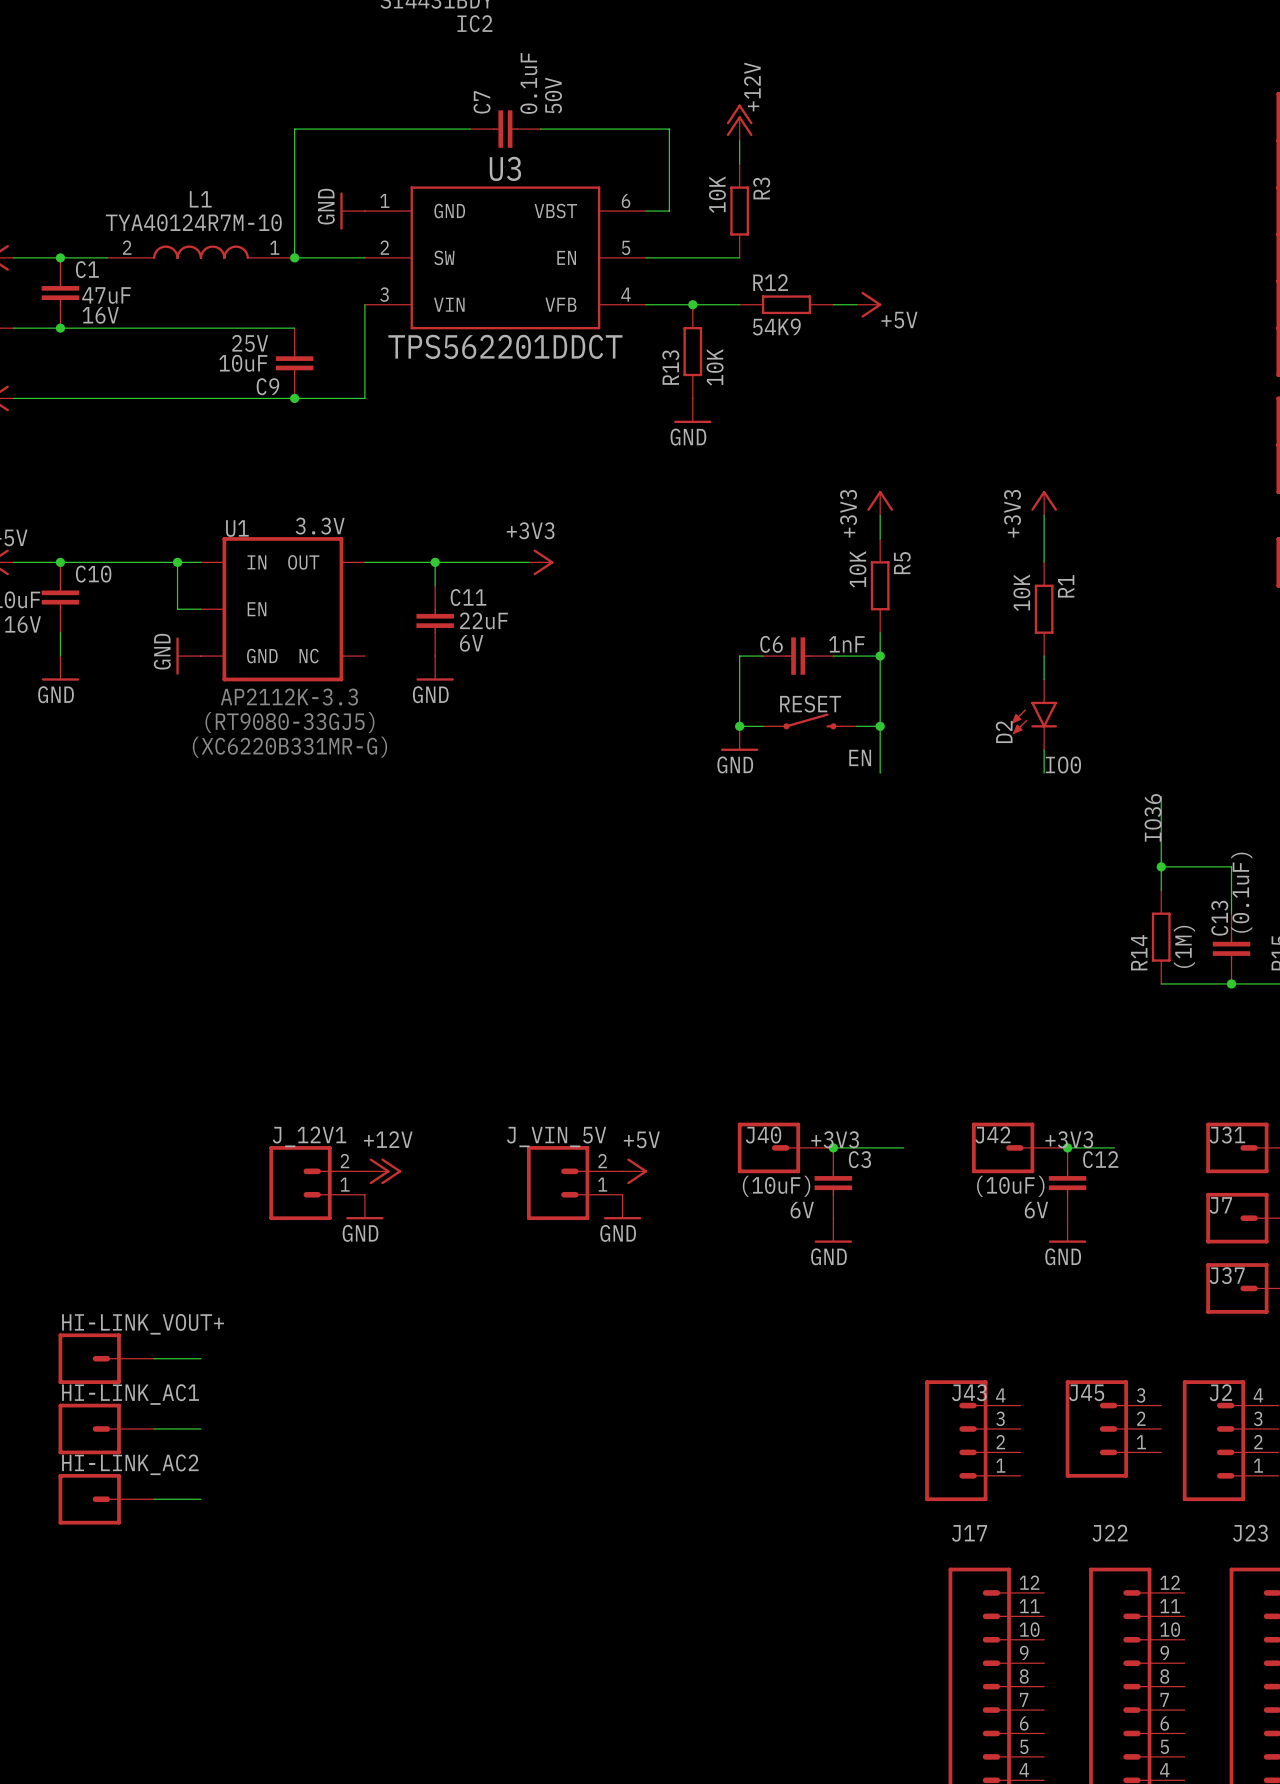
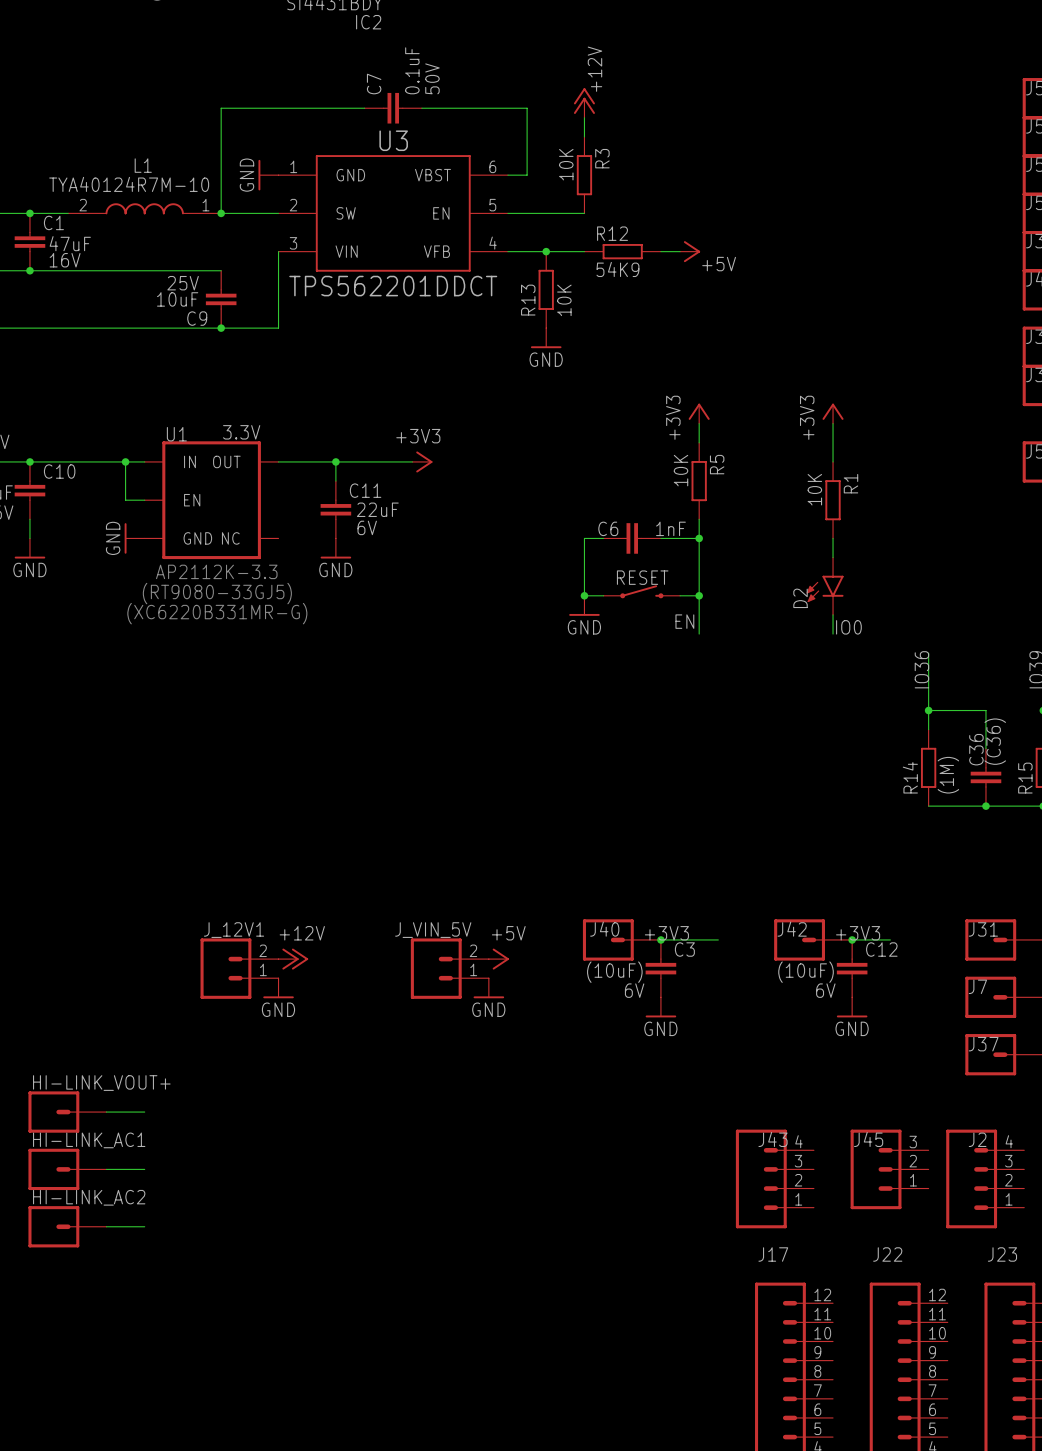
C13 value: (0.1uF) (1241, 892) -> (C36) (995, 741)
C13 name: C13 (1219, 918) -> C36 (976, 749)

